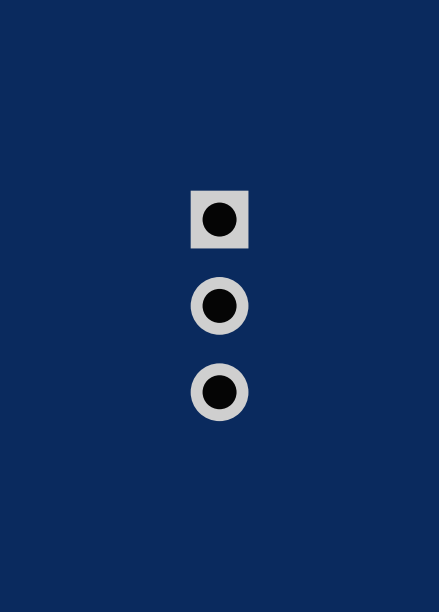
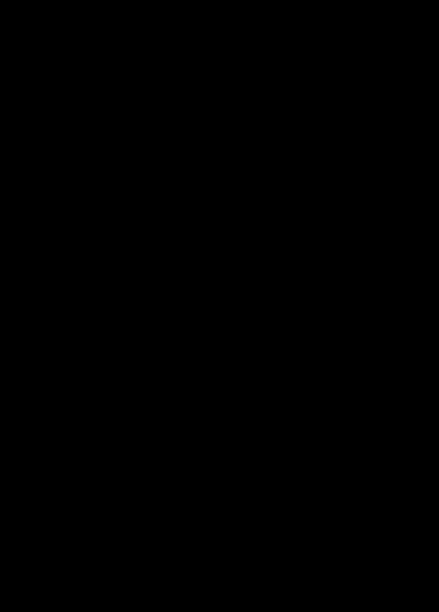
part: (219, 305) -> none

